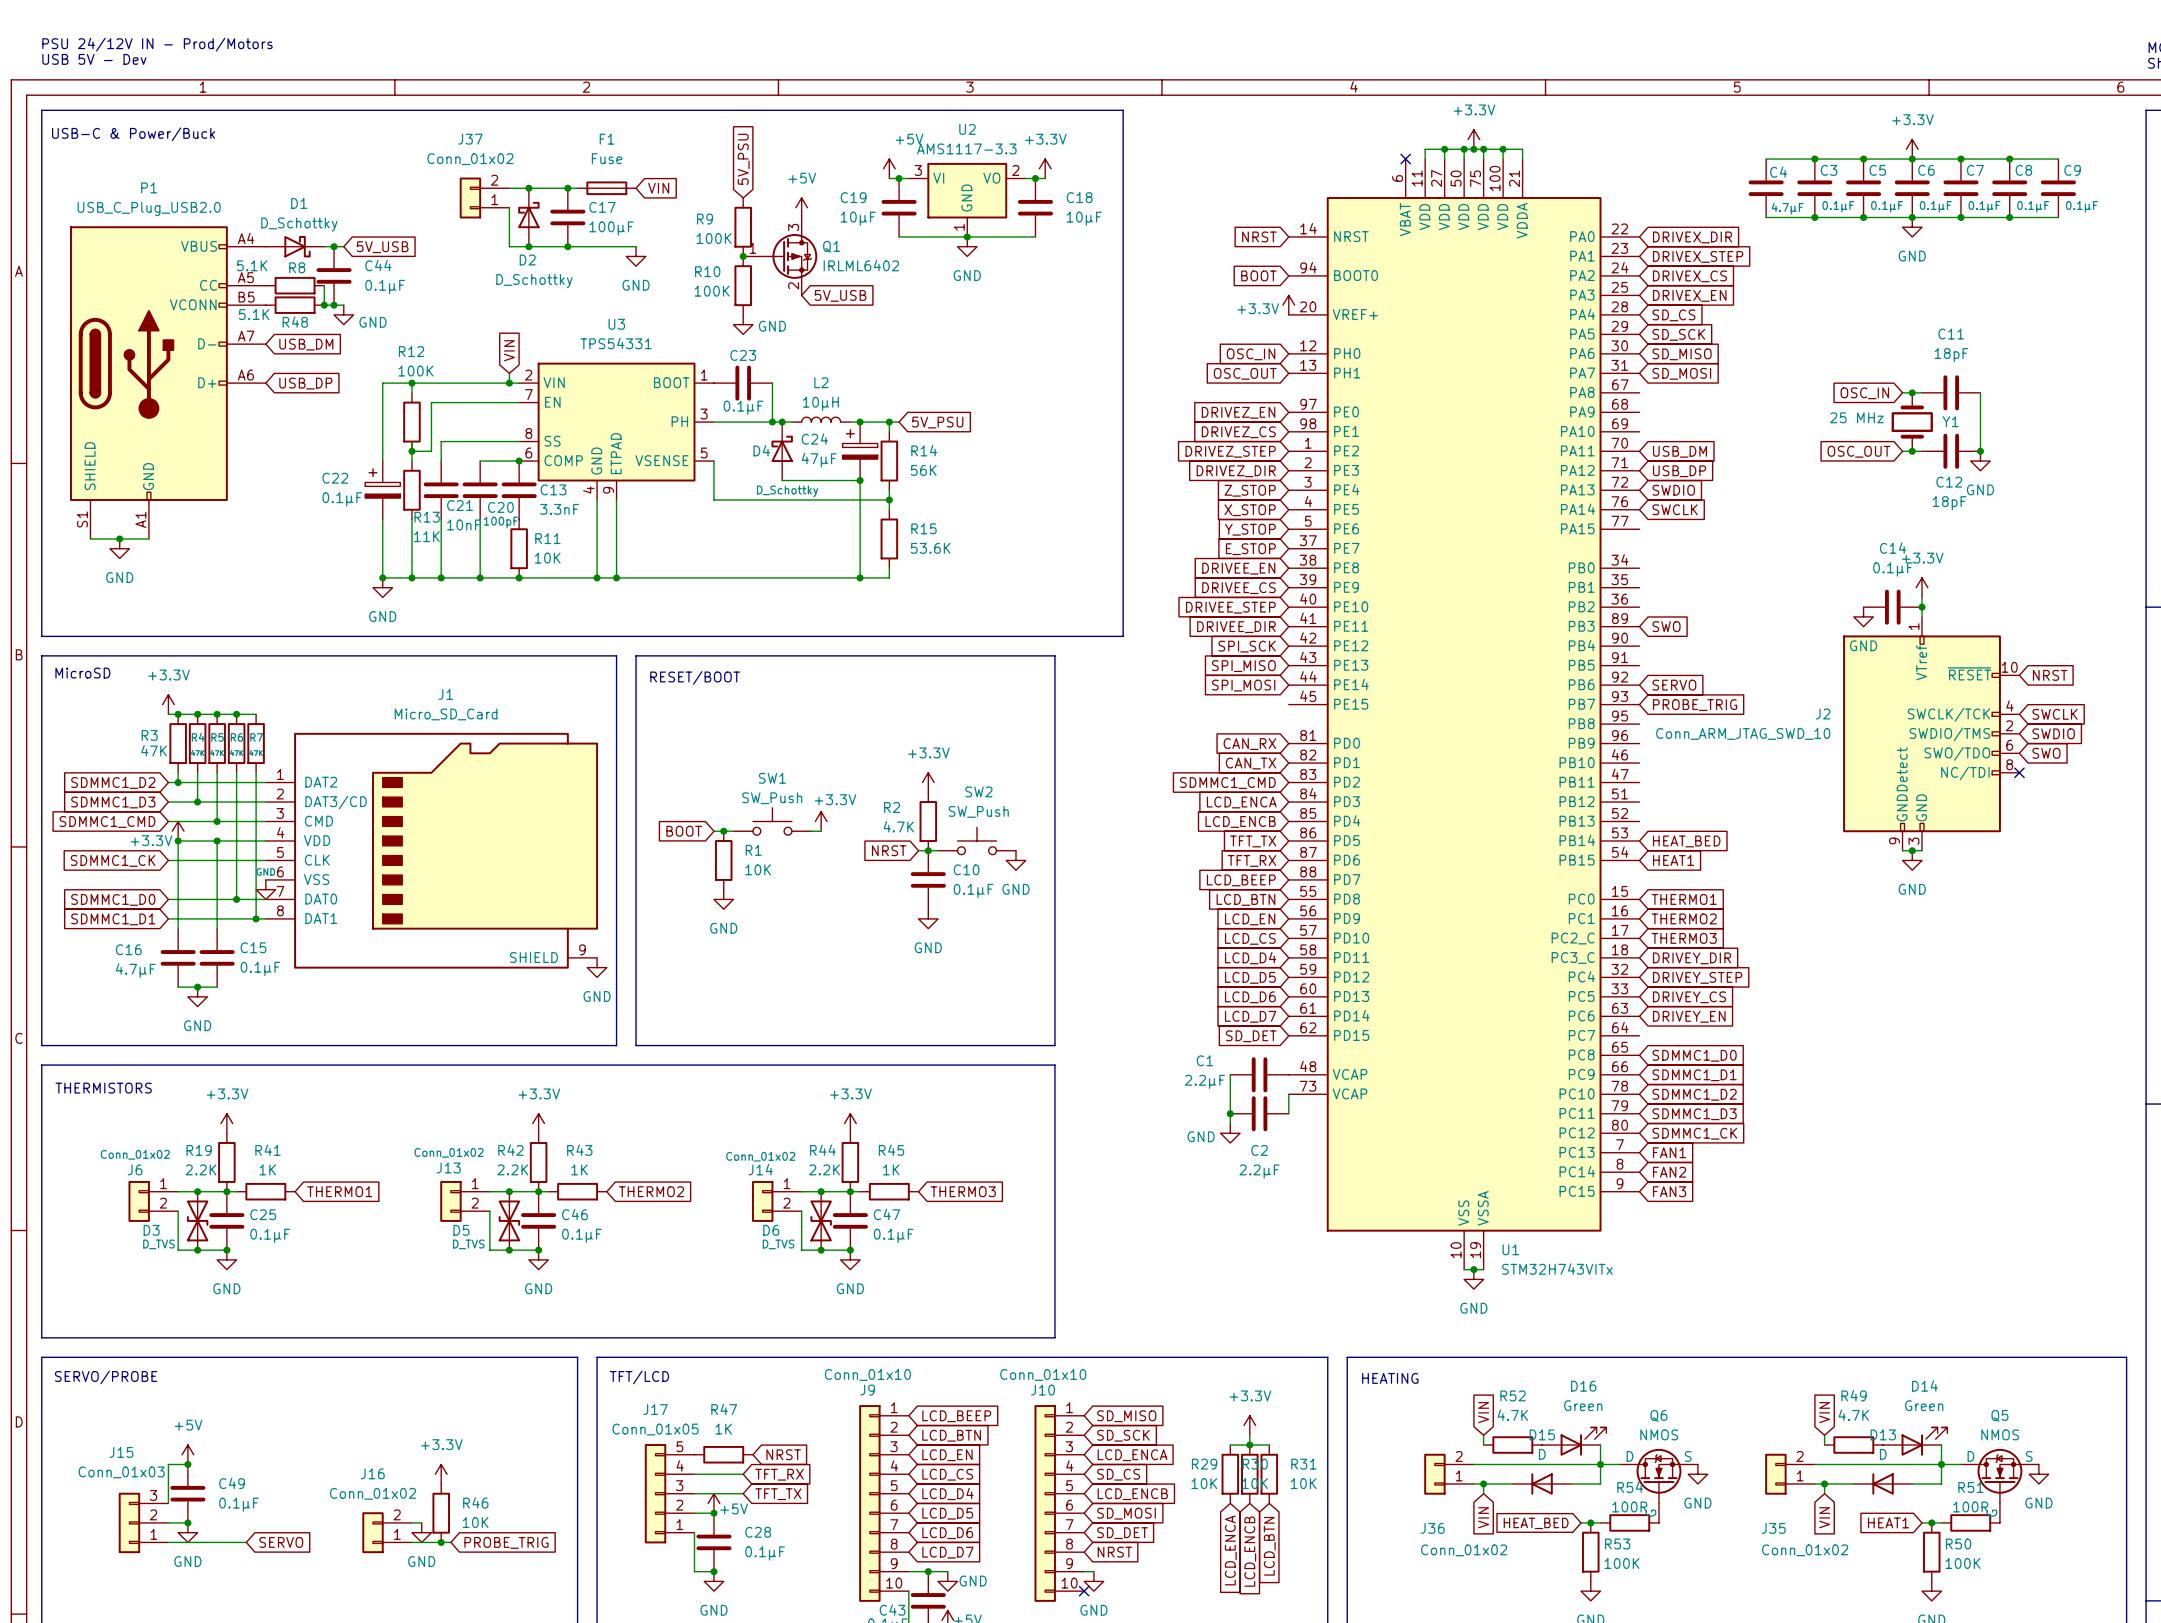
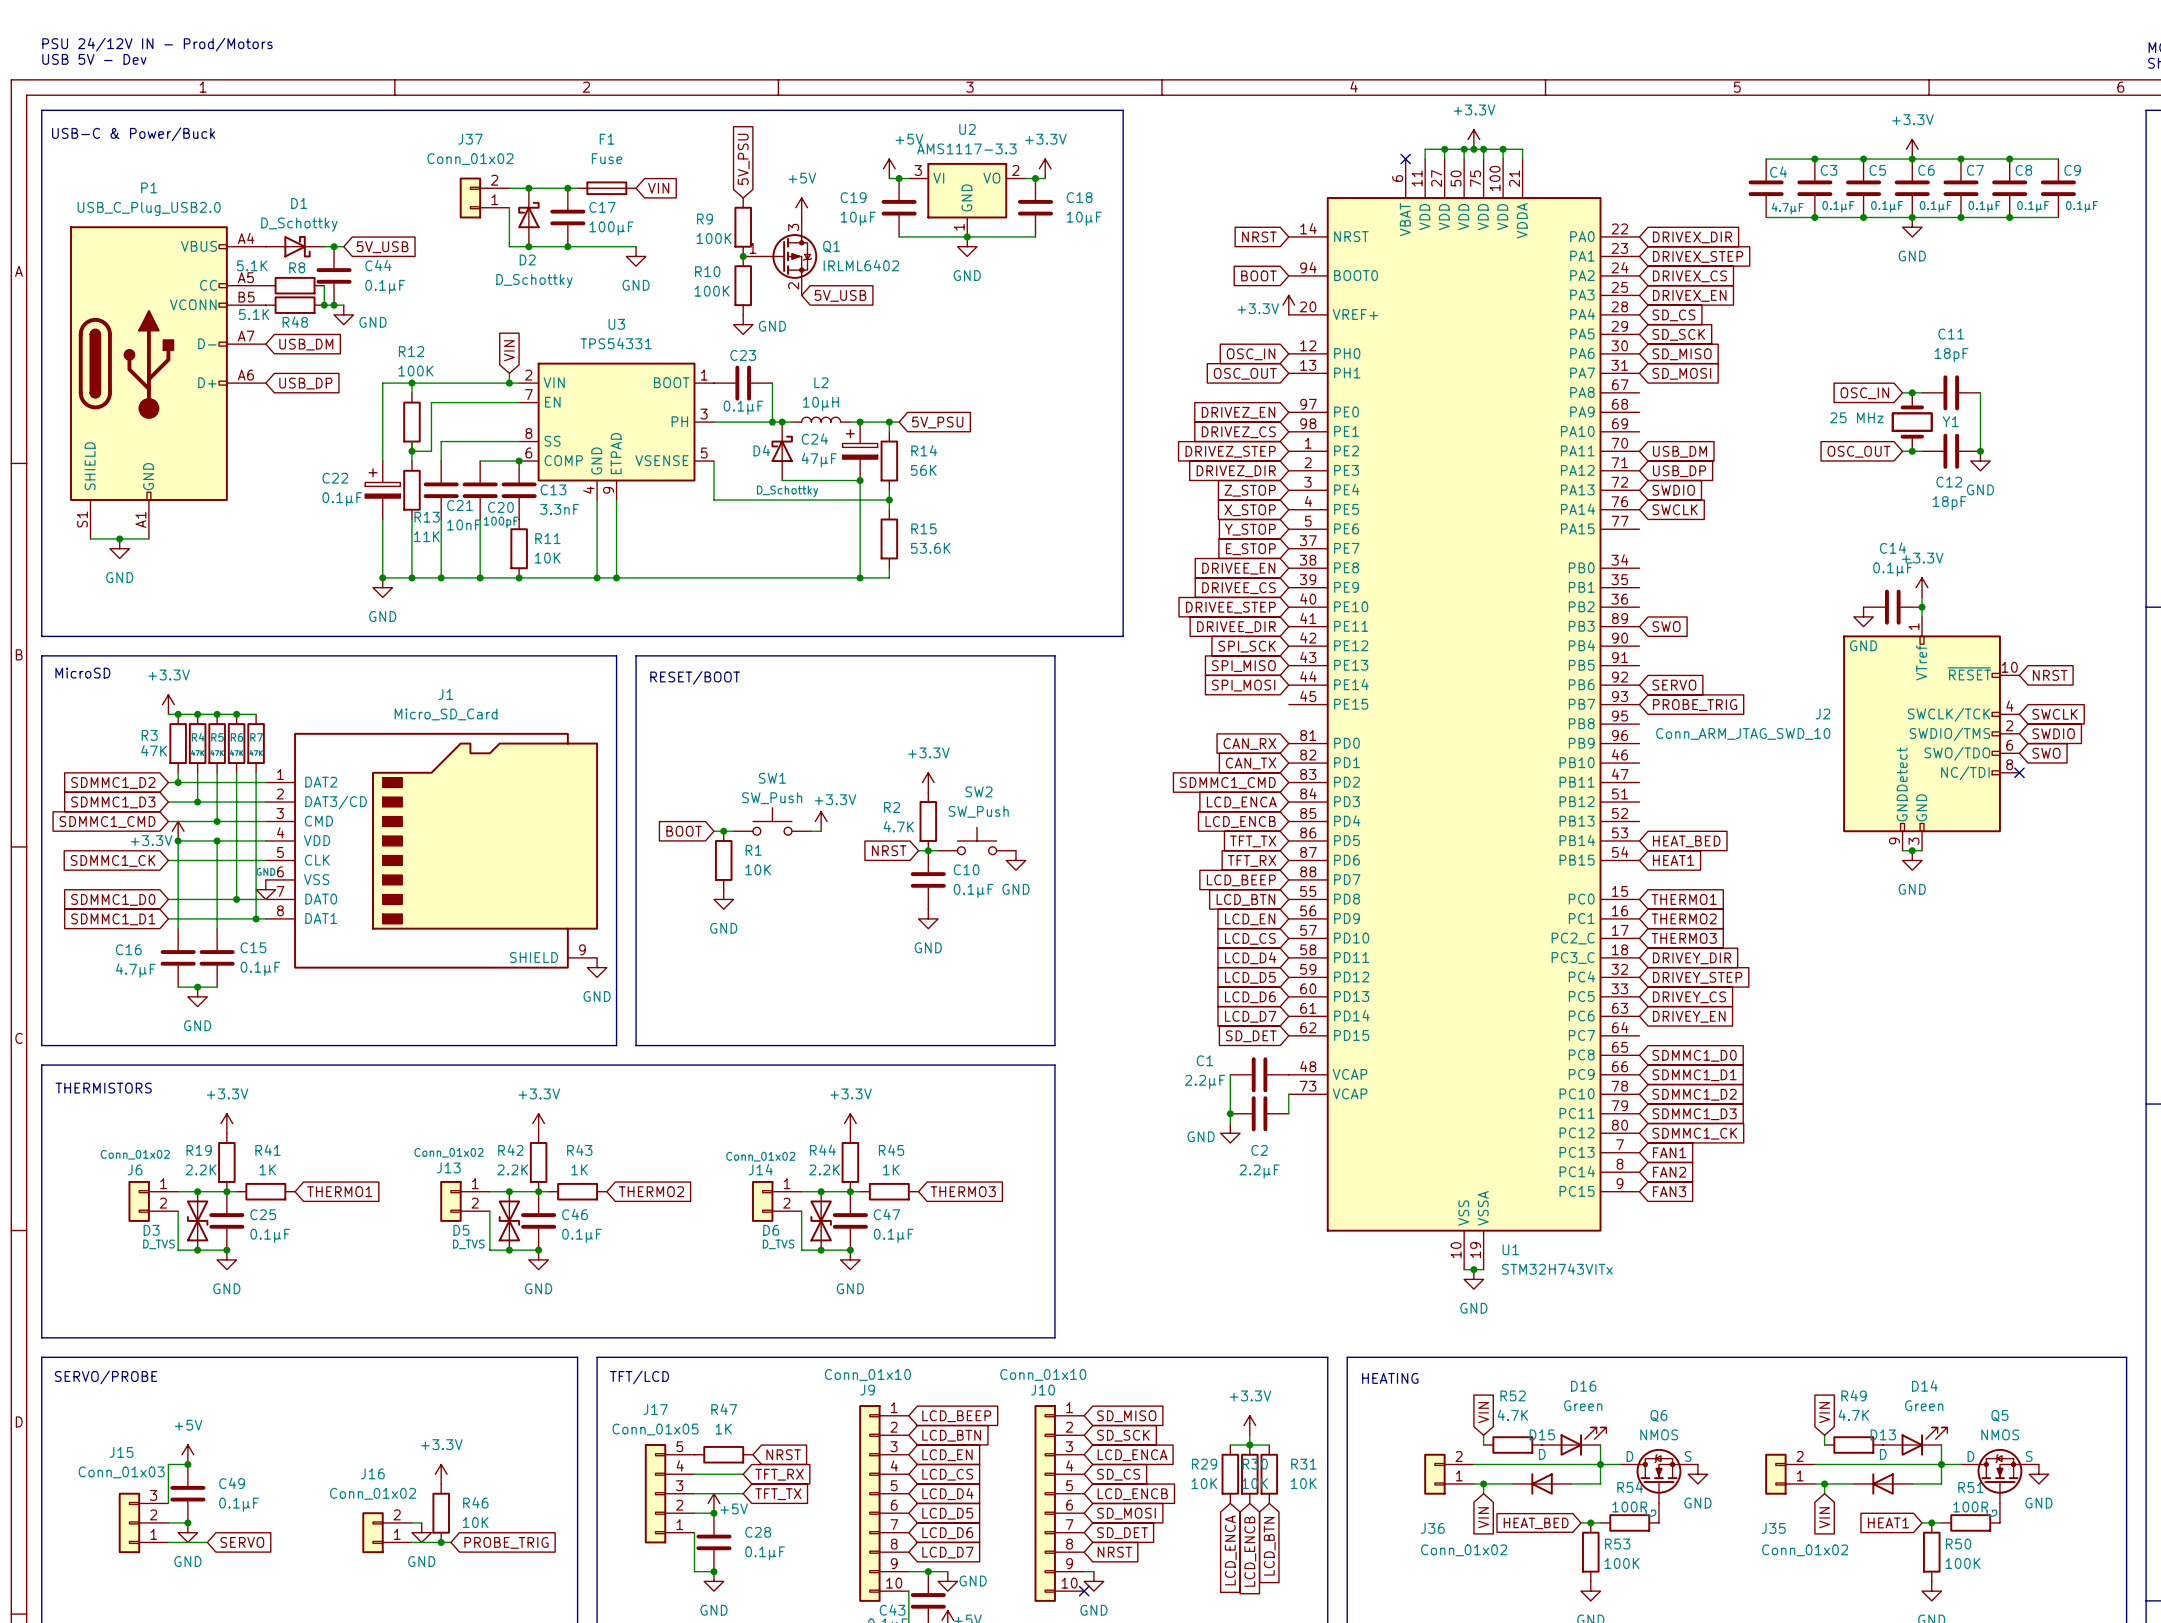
wire: (207, 1542) (246, 1542) -> none
global label position: SERVO (281, 1542) -> SERVO (242, 1542)

